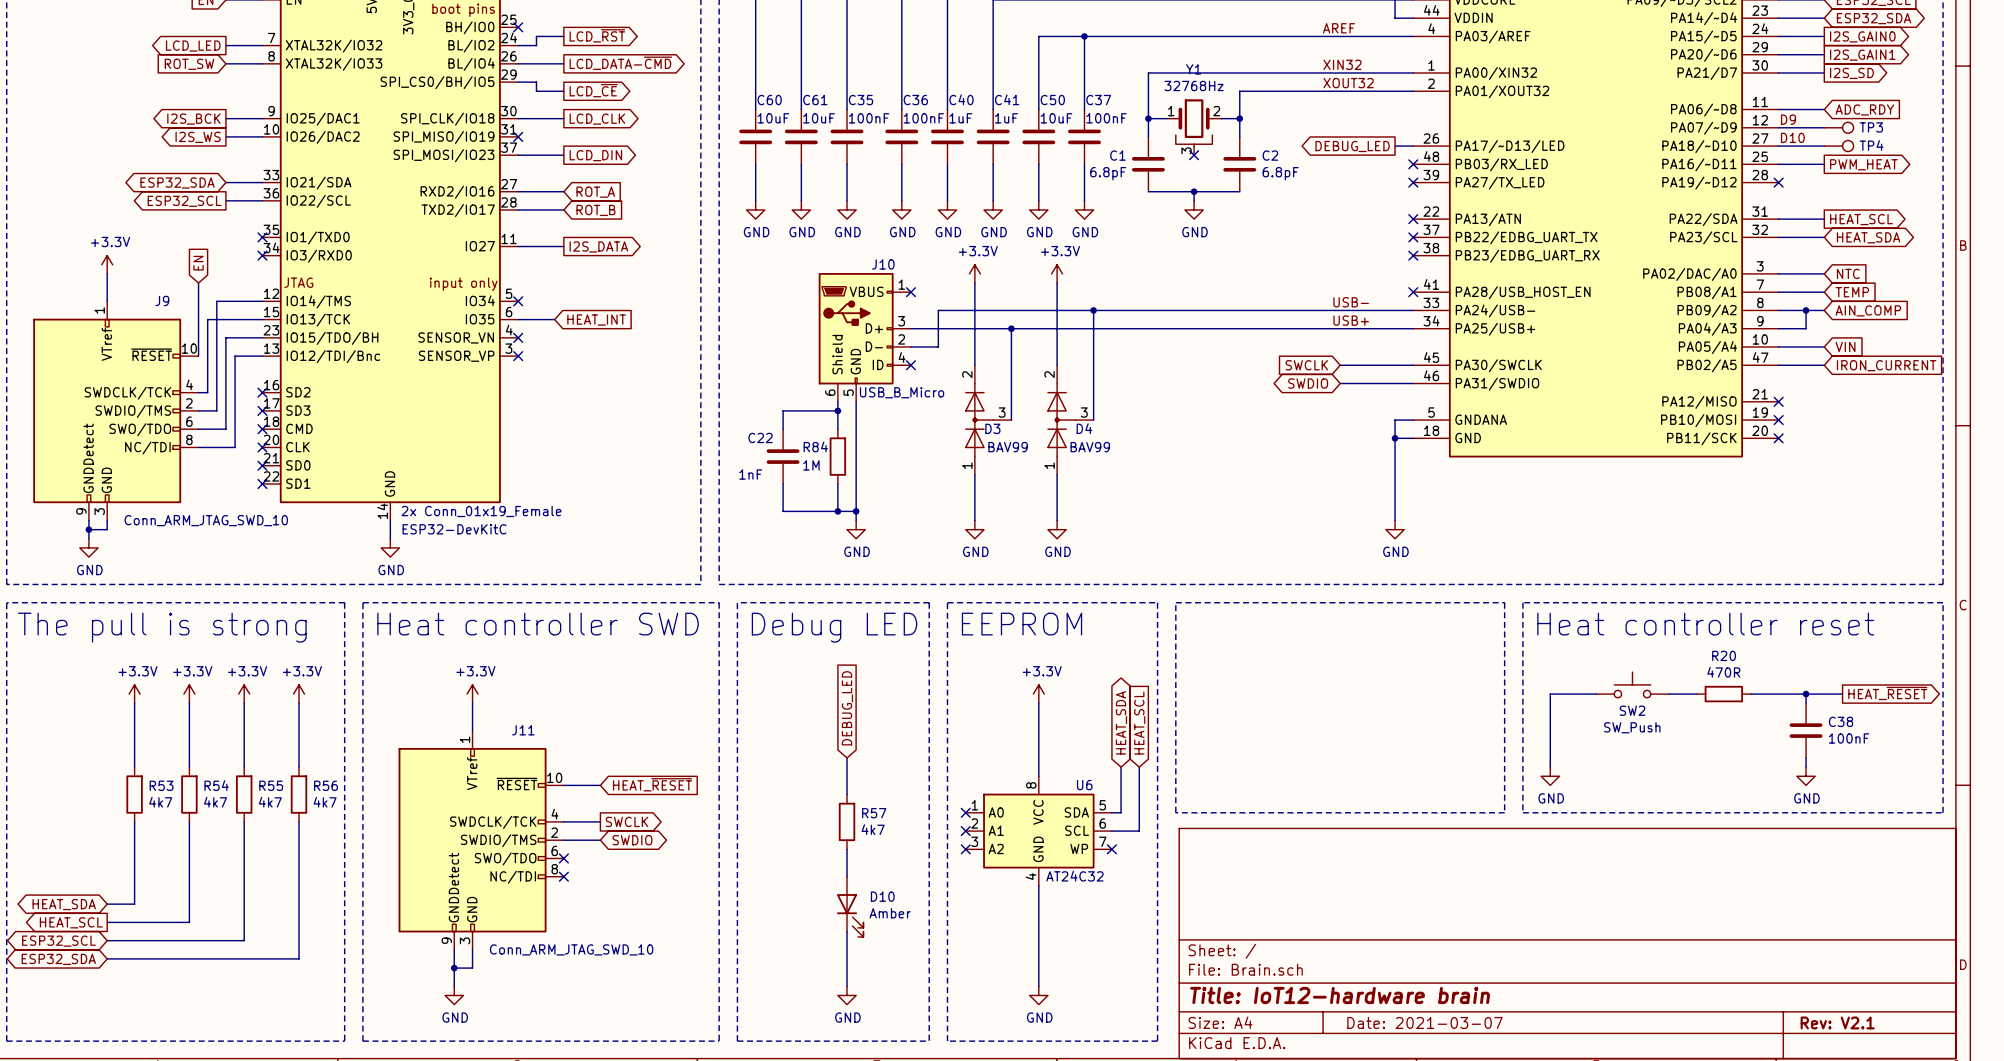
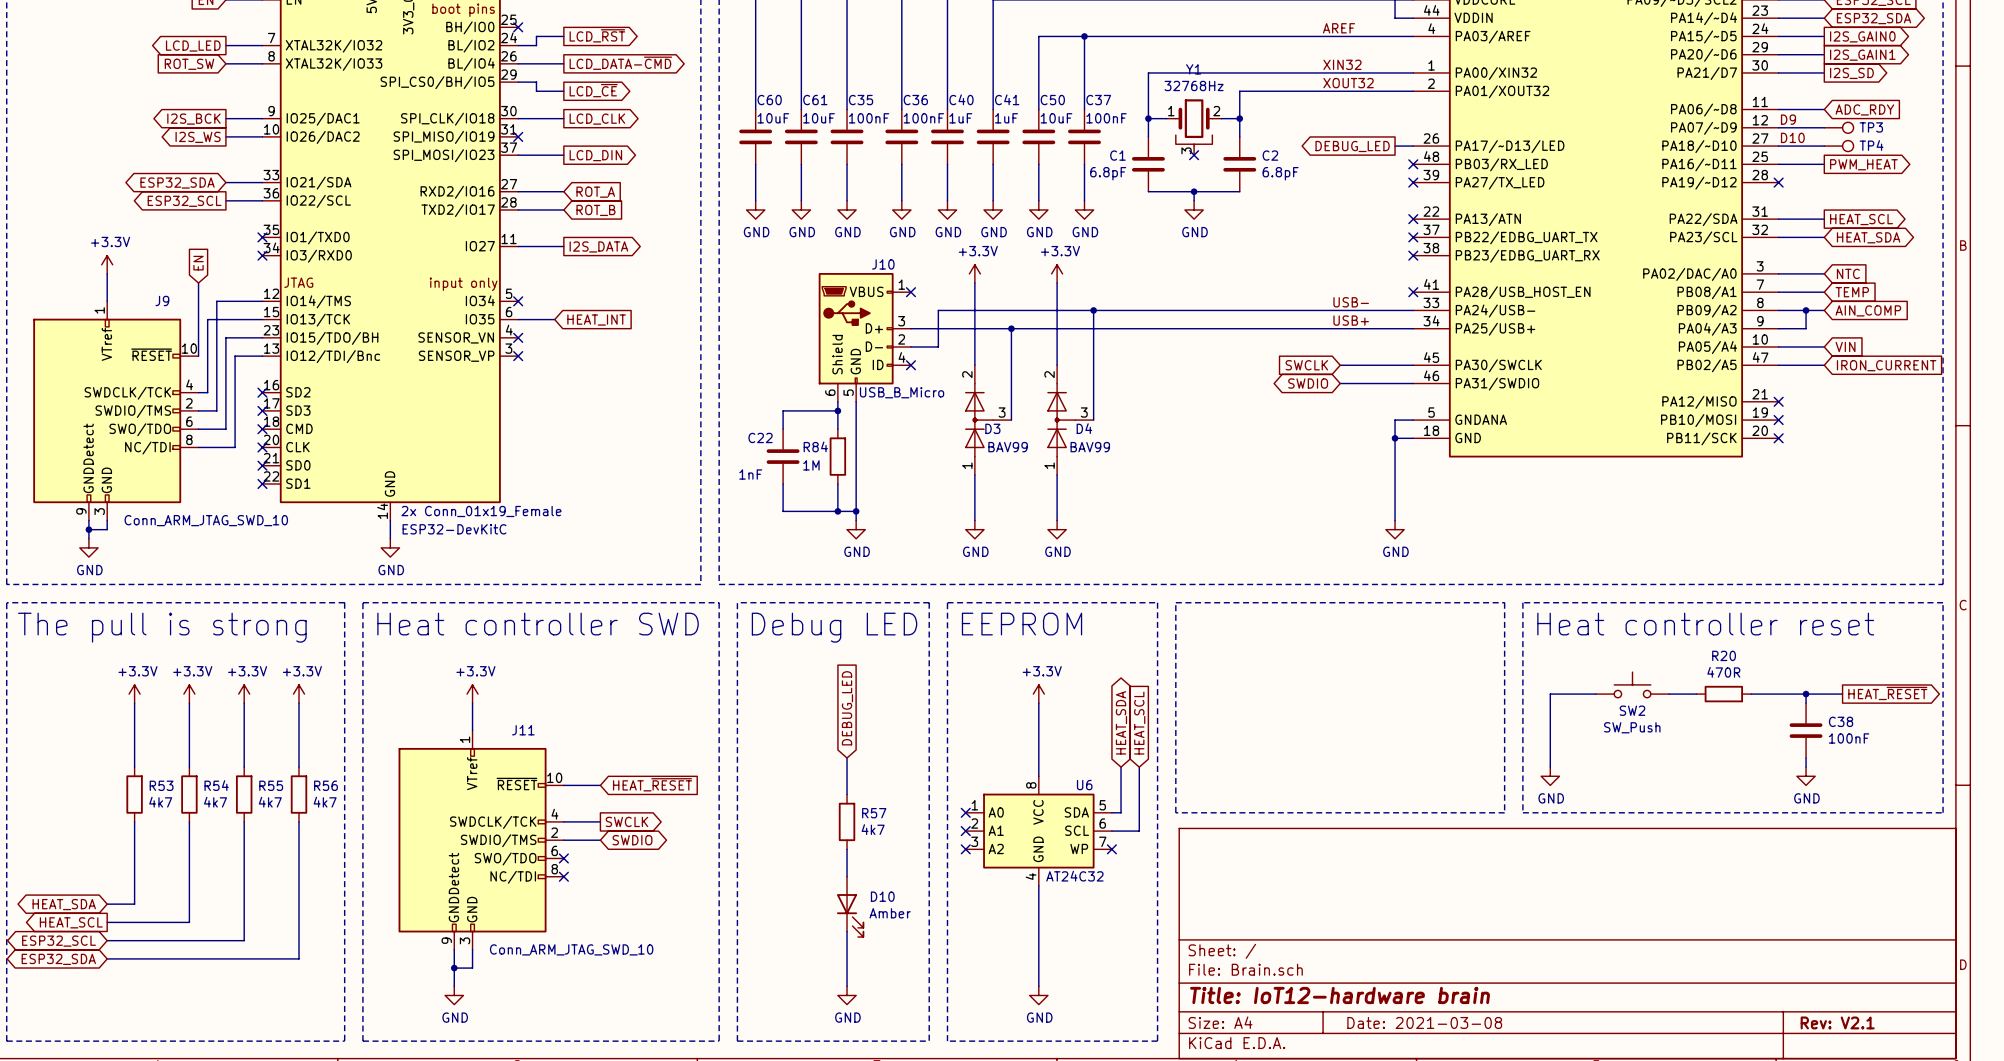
title block: Date: 2021-03-07 (1424, 1022) -> Date: 2021-03-08 (1424, 1022)

